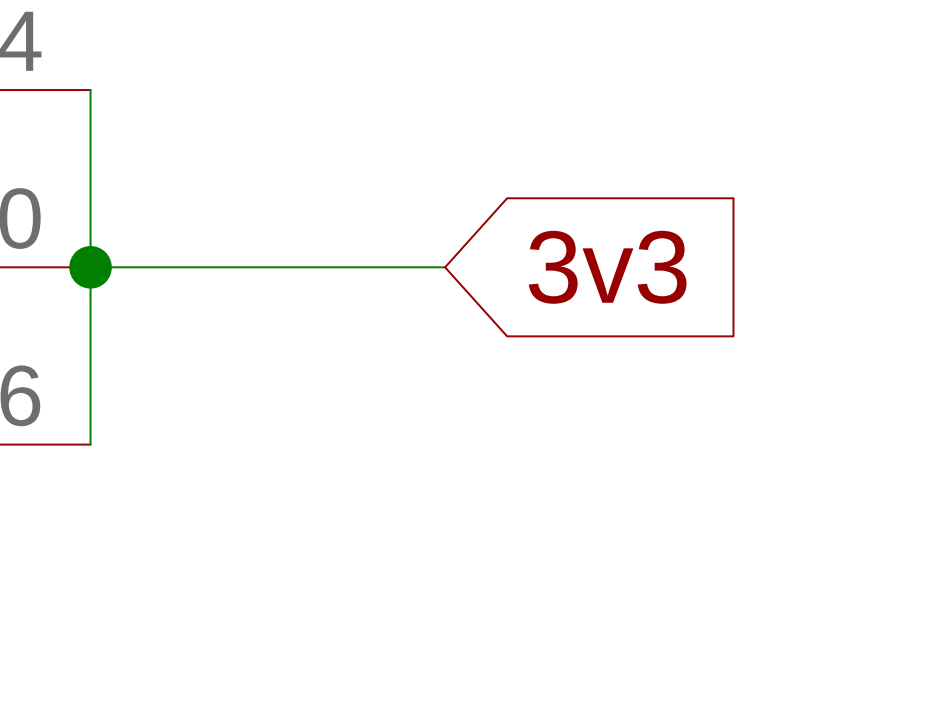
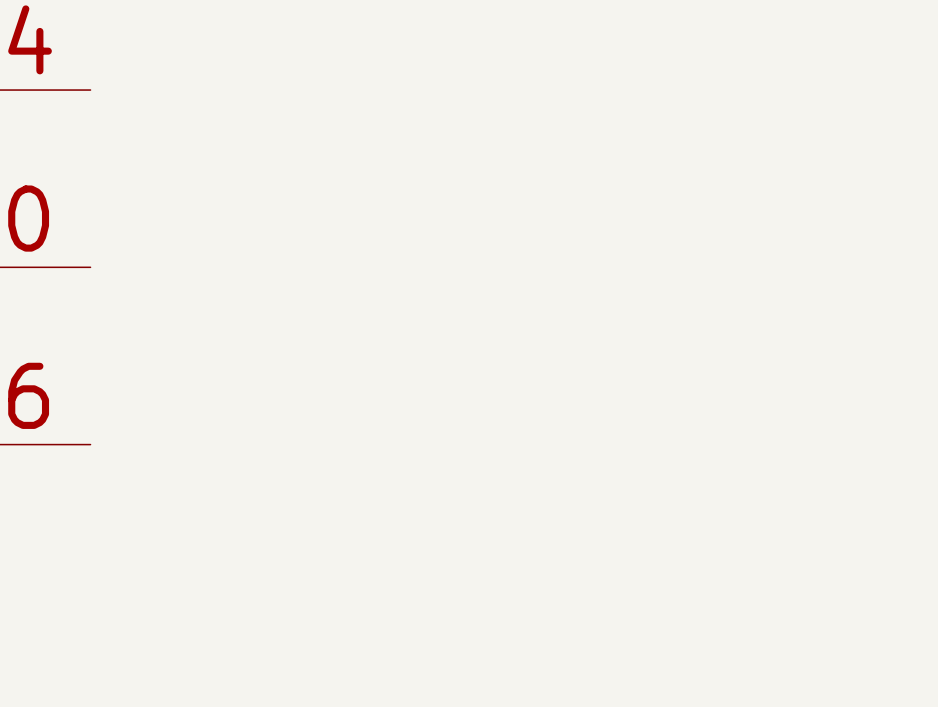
wire: (90, 90) (90, 444) -> none
wire: (90, 267) (445, 267) -> none
junction: (90, 267) -> none
global label: 3v3 (607, 267) -> none

